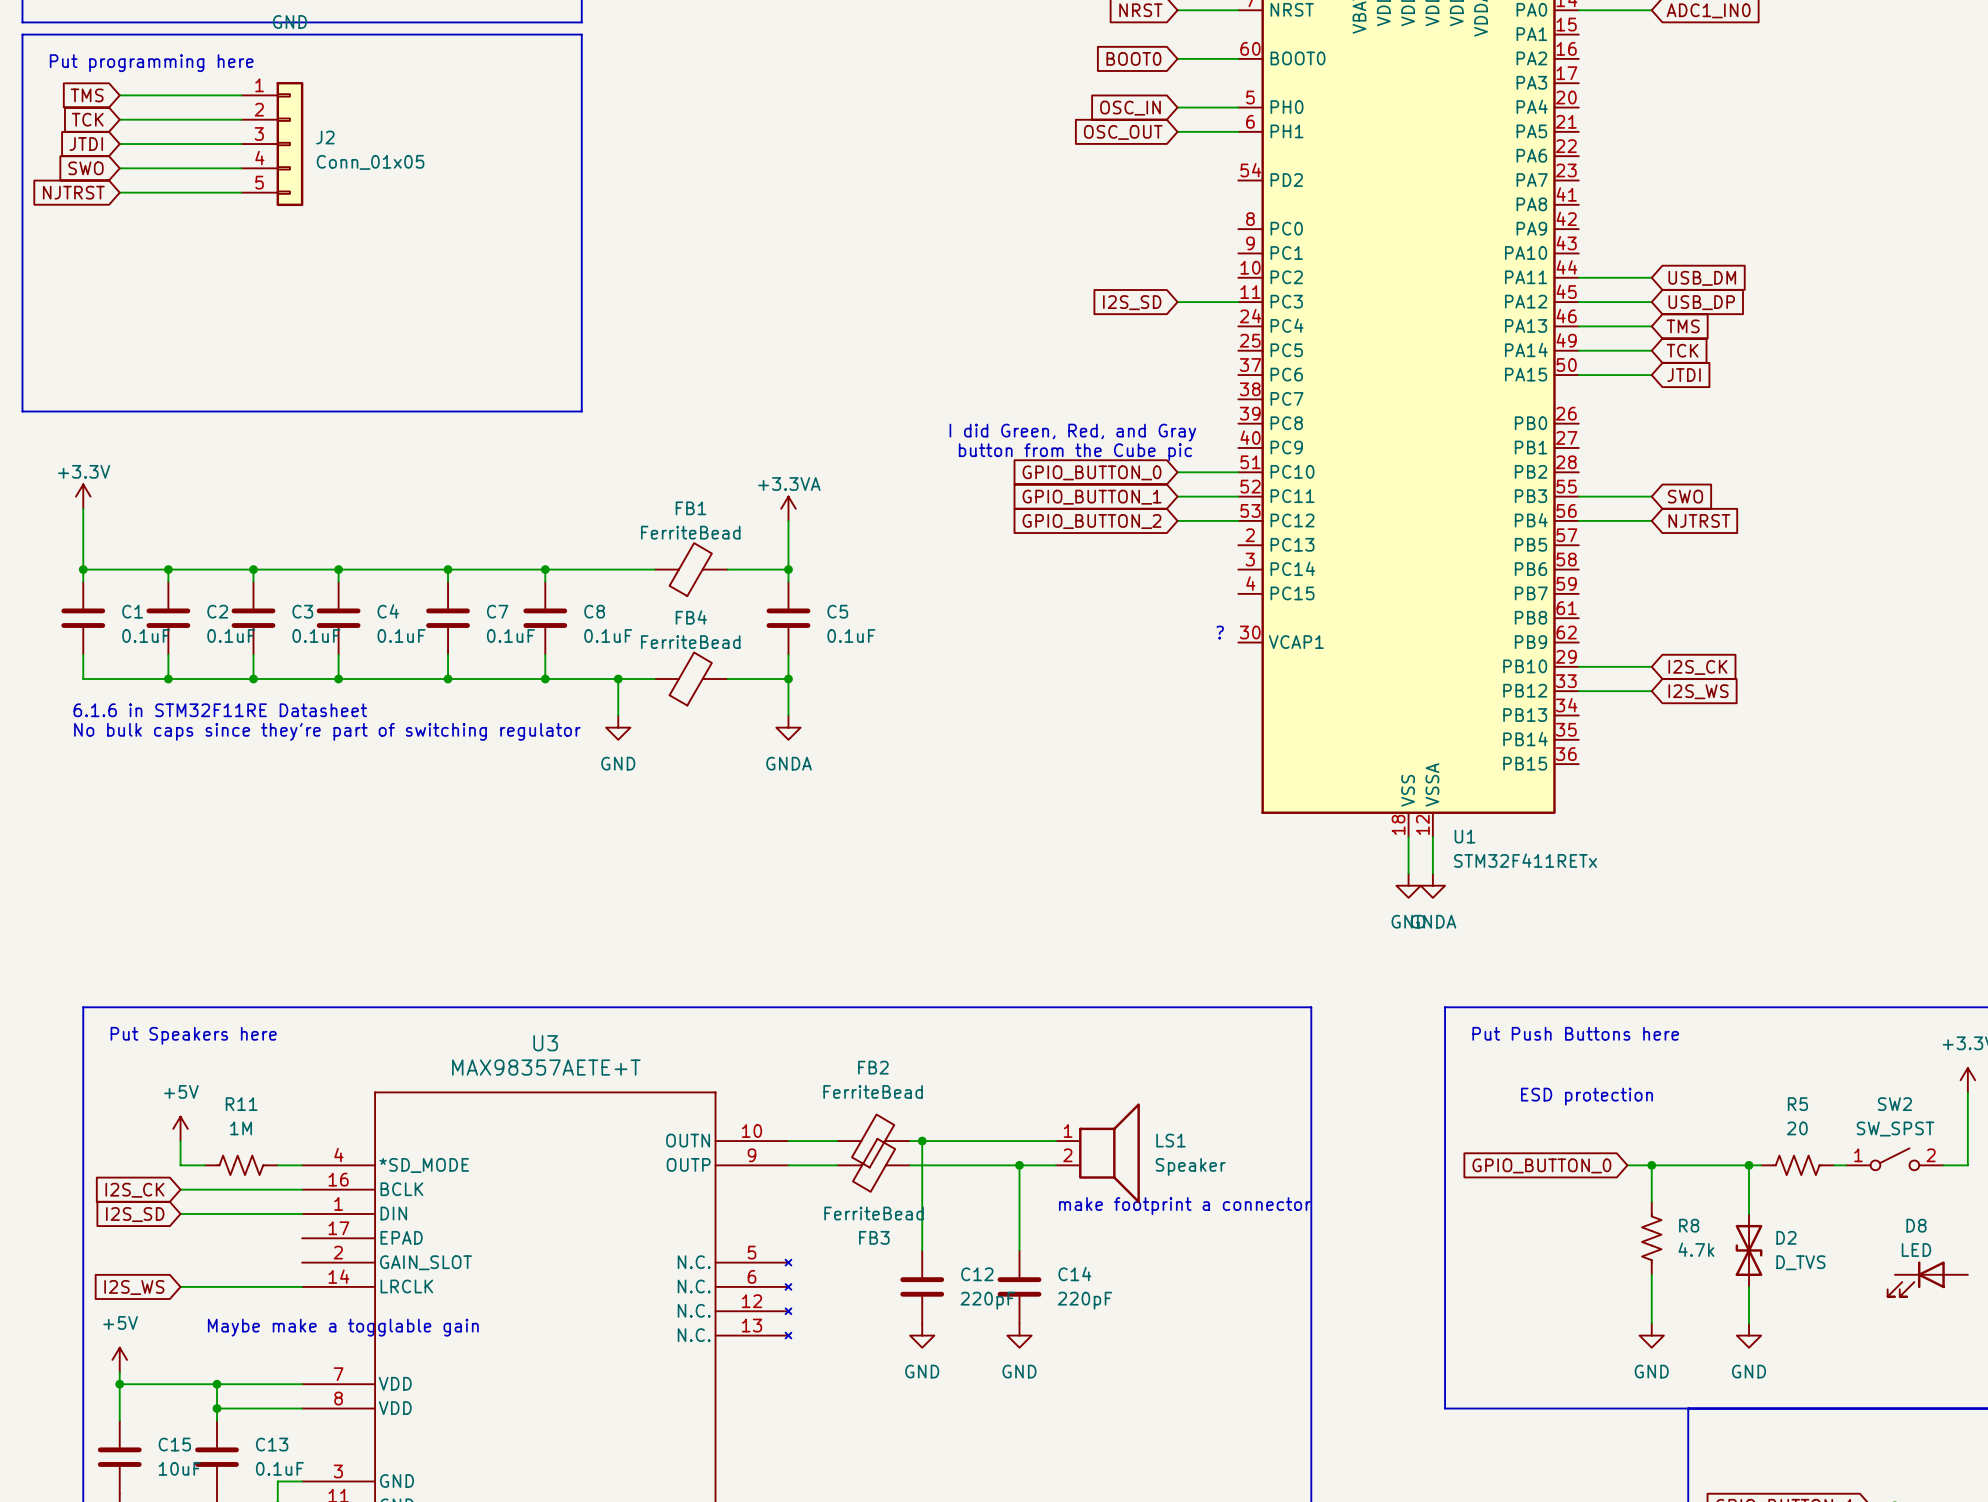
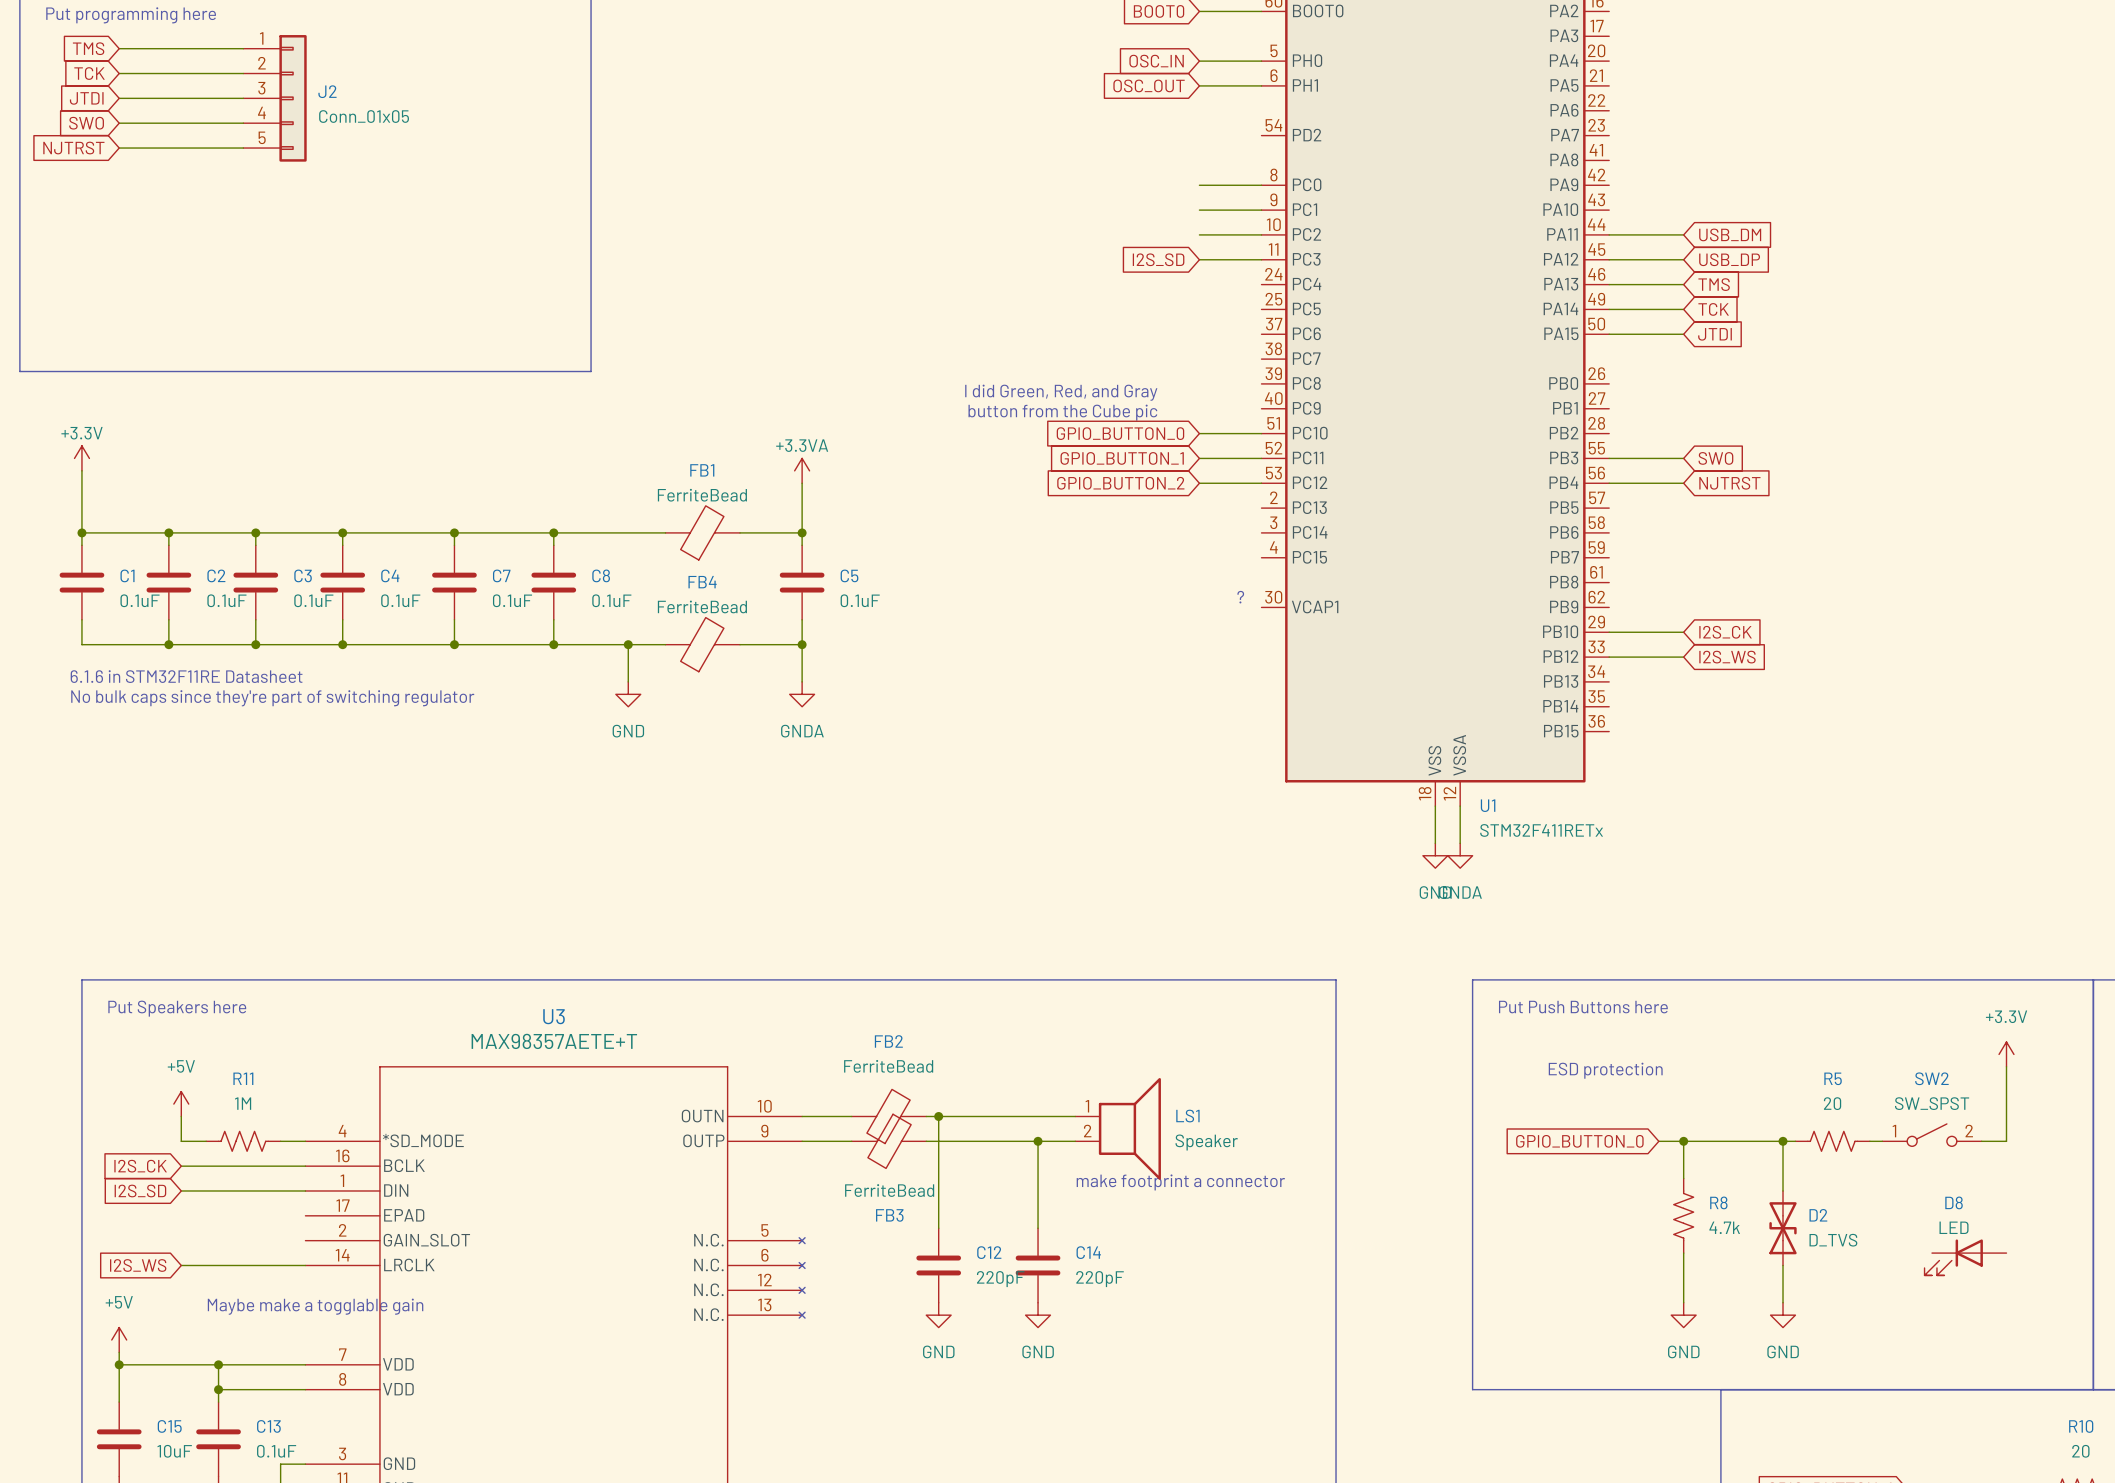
wire: none -> (1199, 185) (1261, 185)
wire: none -> (1199, 210) (1261, 210)
wire: none -> (1199, 234) (1261, 234)

